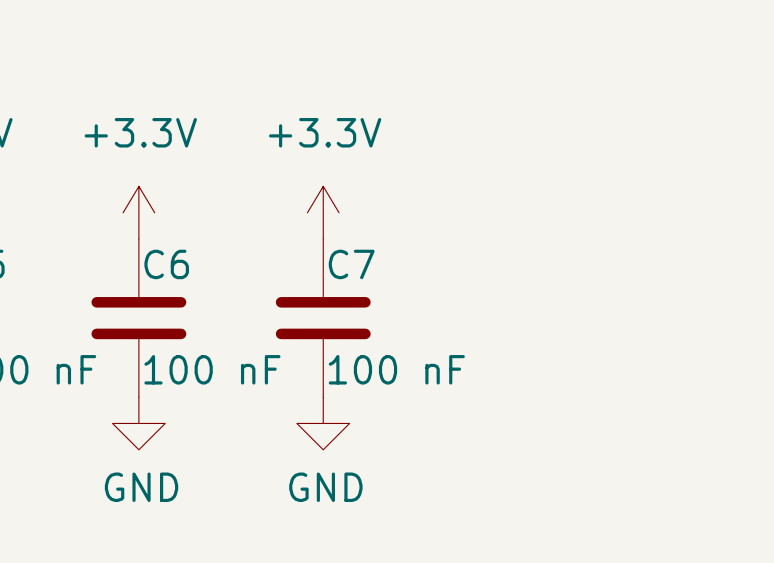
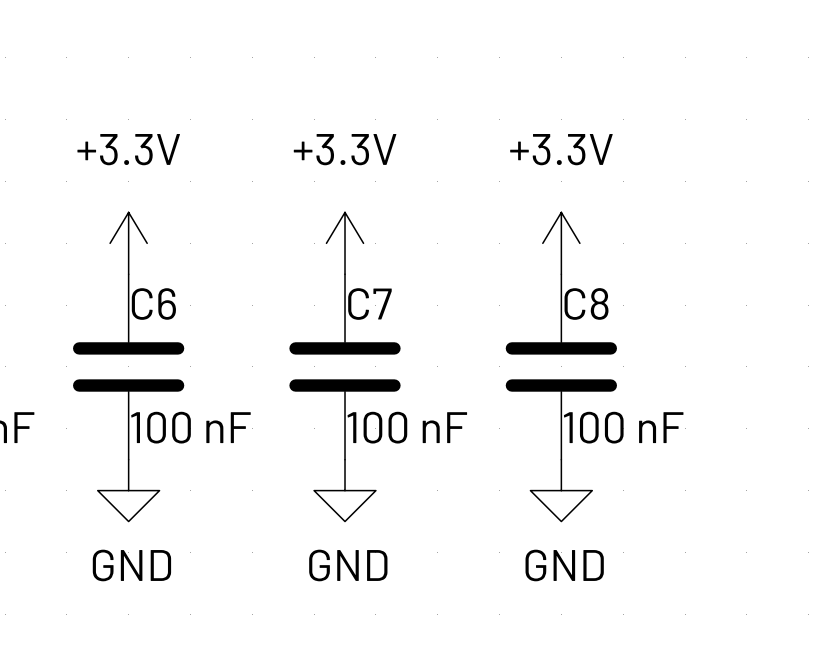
power symbol: none -> +3.3V (561, 243)
C8: none -> 100 nF (561, 366)
power symbol: none -> GND (561, 490)

